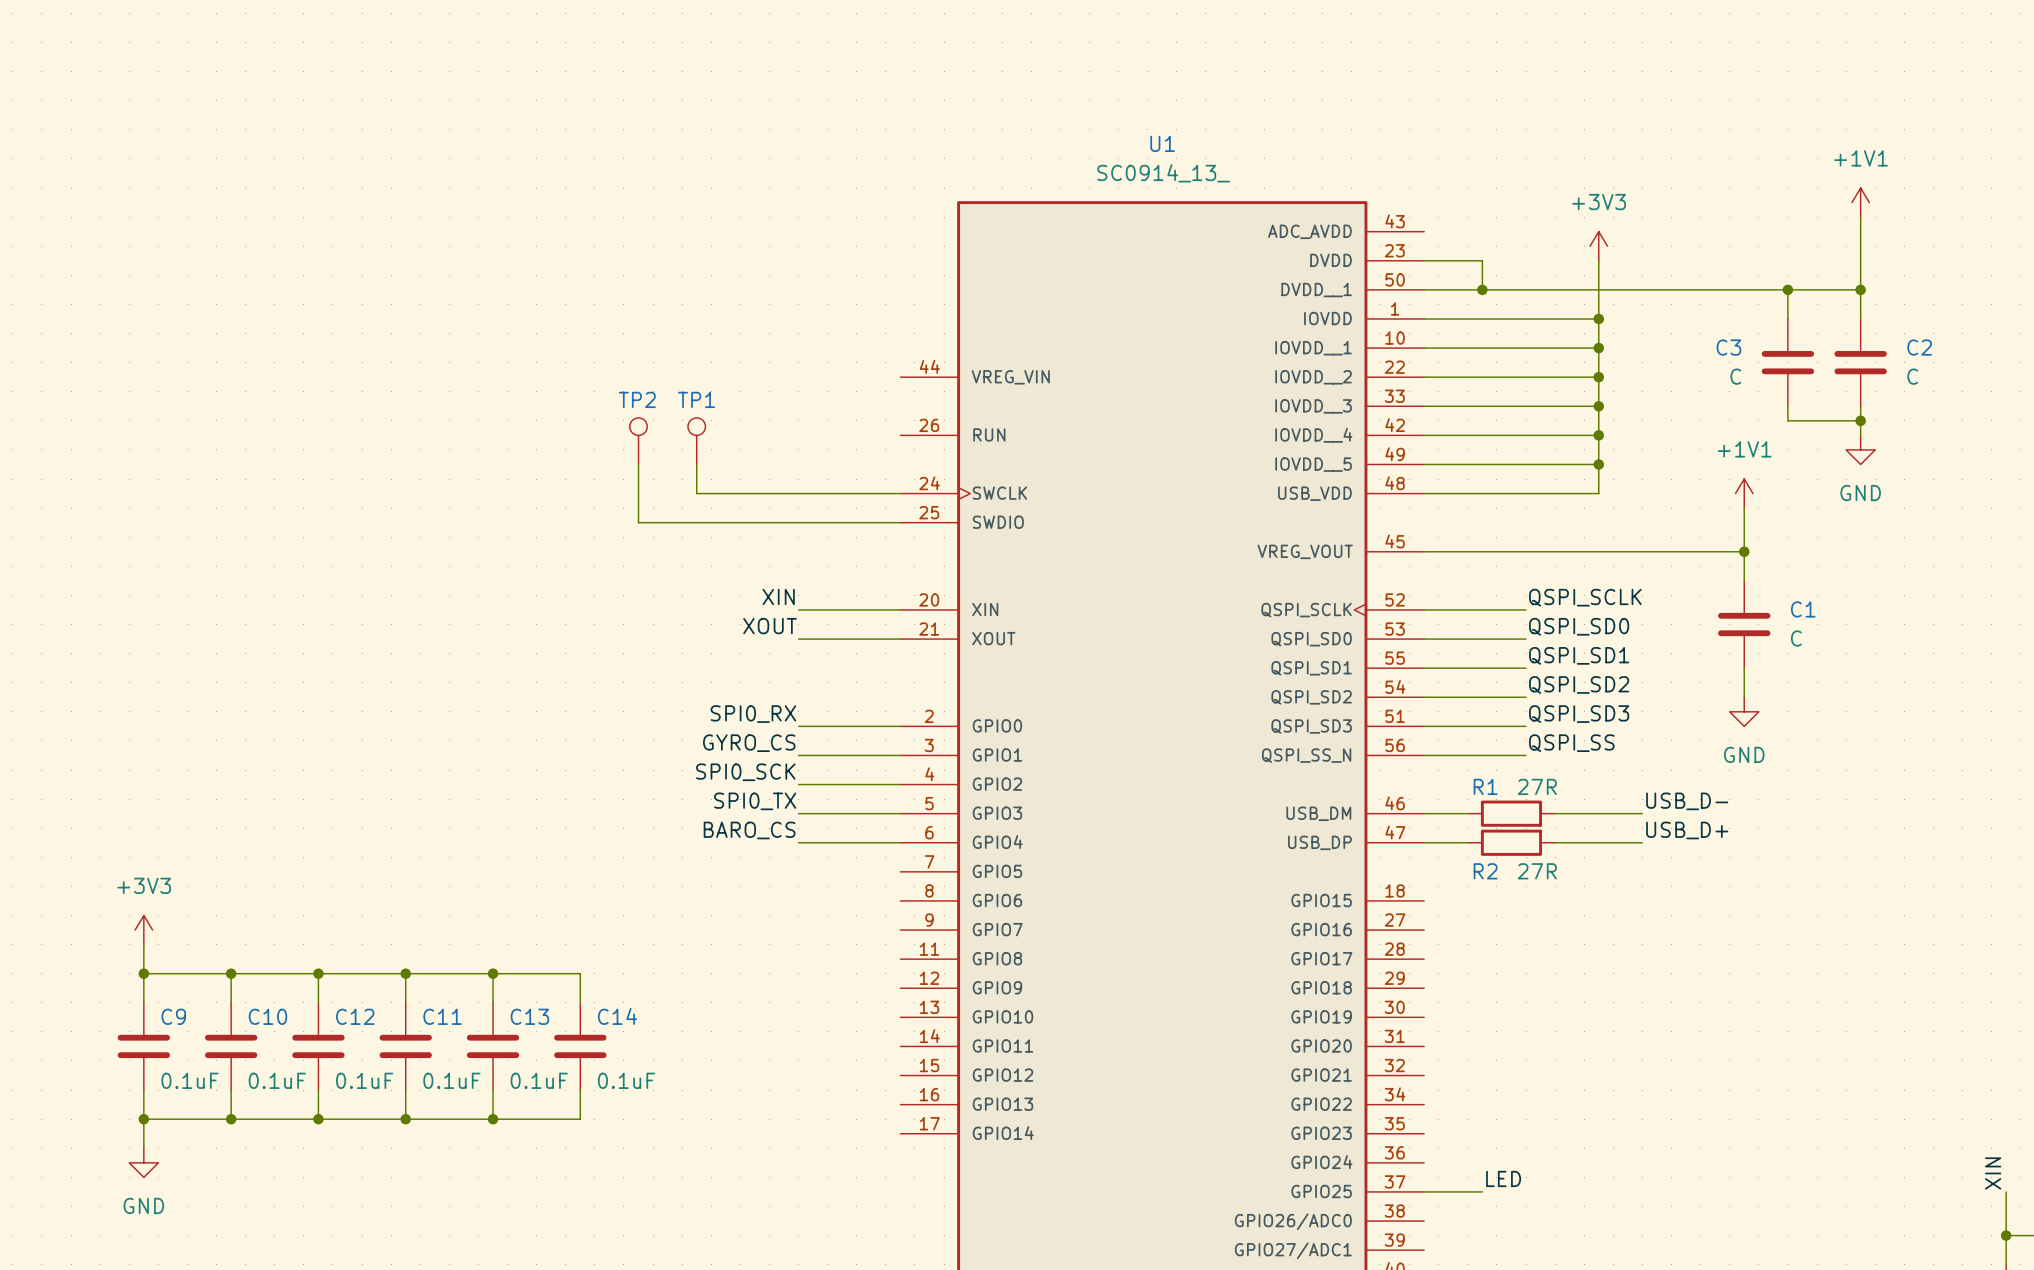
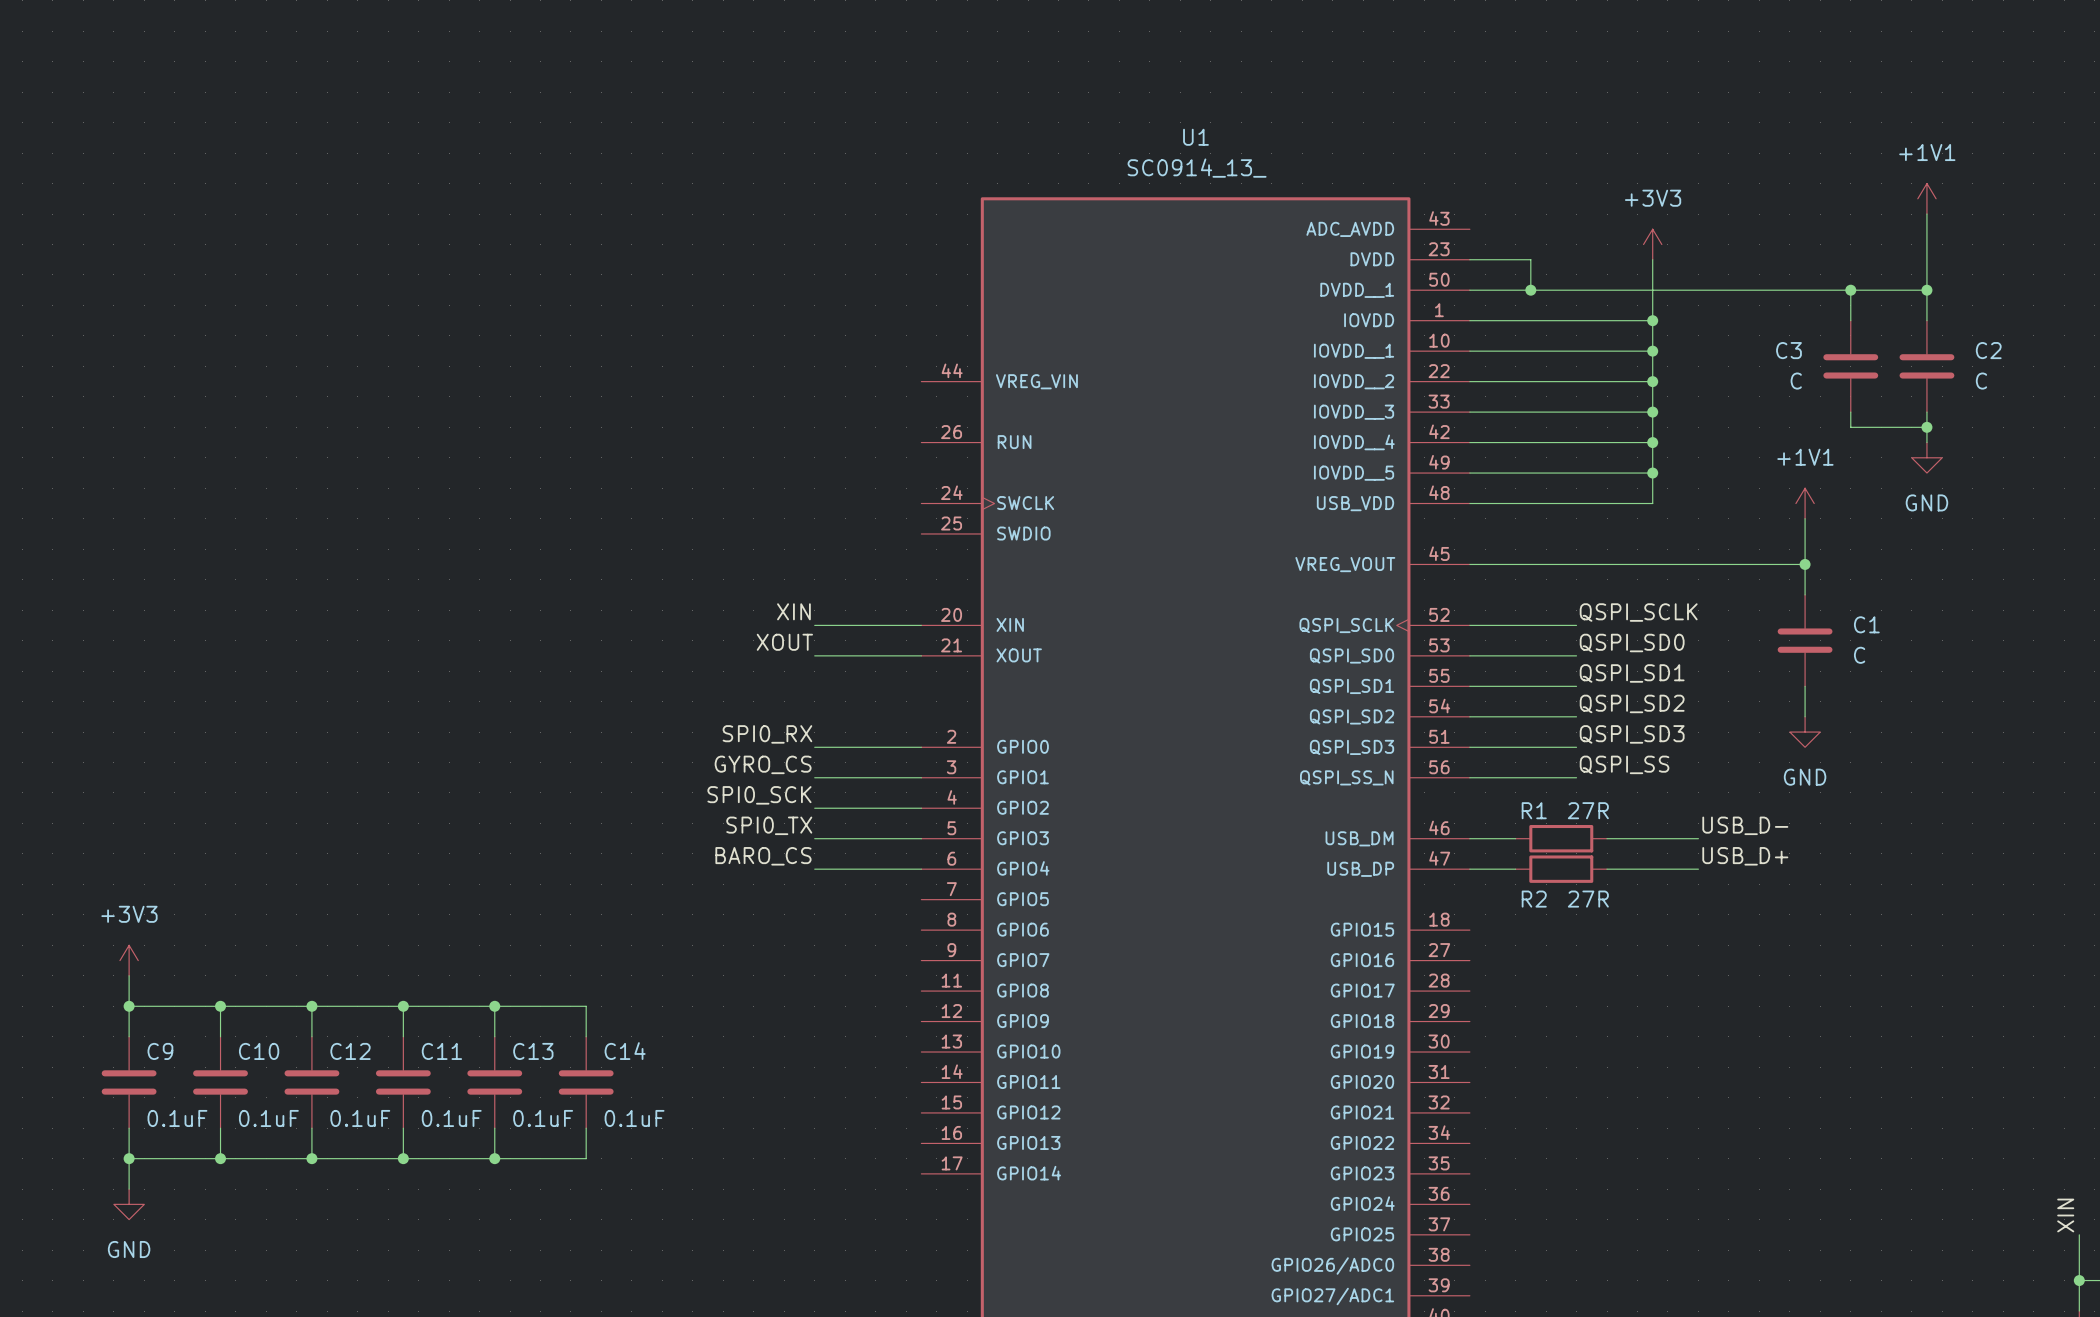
TP2: (638, 441) -> none
TP1: (696, 441) -> none
wire: (638, 464) (638, 522) (900, 522) -> none
wire: (696, 464) (696, 493) (900, 493) -> none
label: LED (1503, 1178) -> none
wire: (1424, 1191) (1482, 1191) -> none

